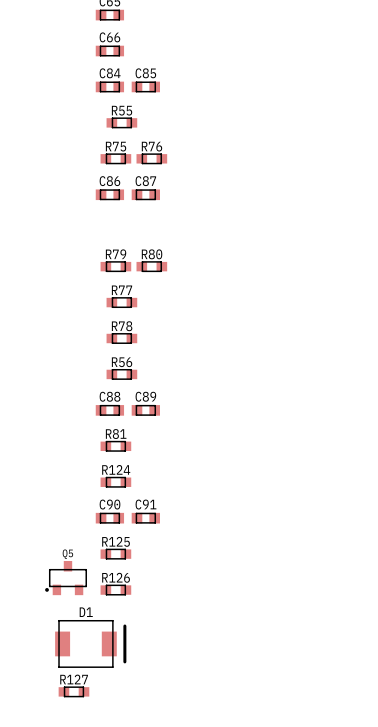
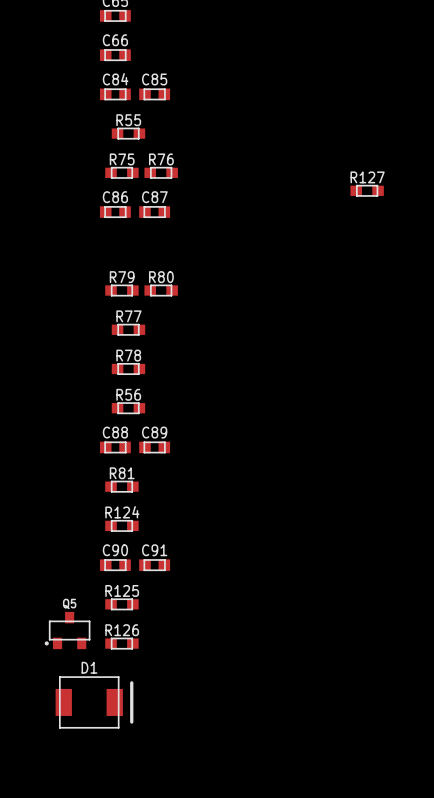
R127 position: (73, 691) -> (367, 190)

